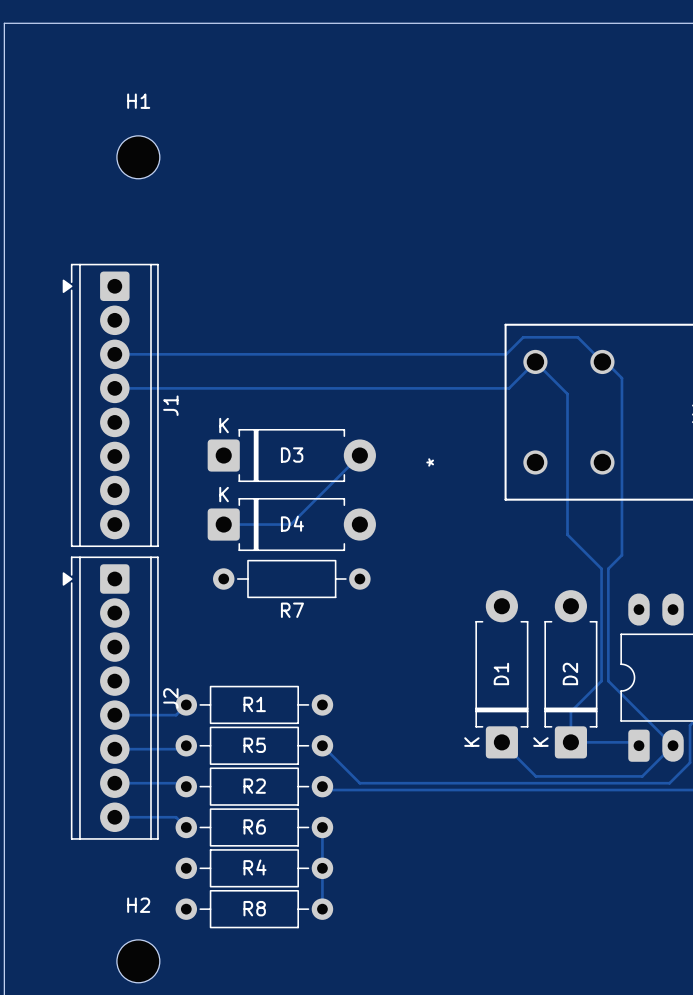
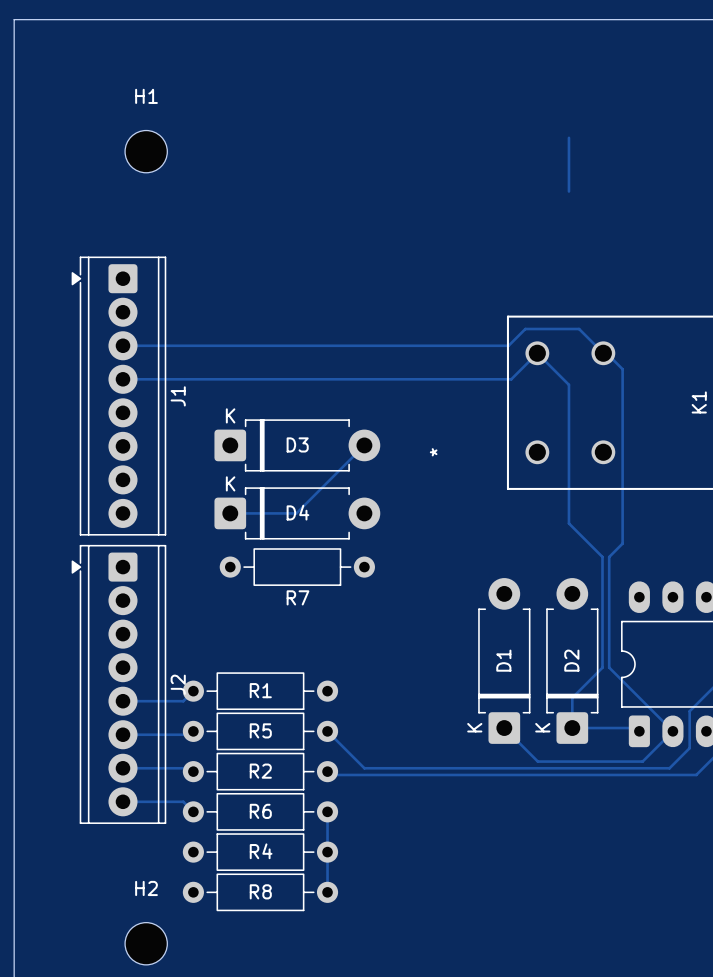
track: none -> (568, 137) (568, 191)

